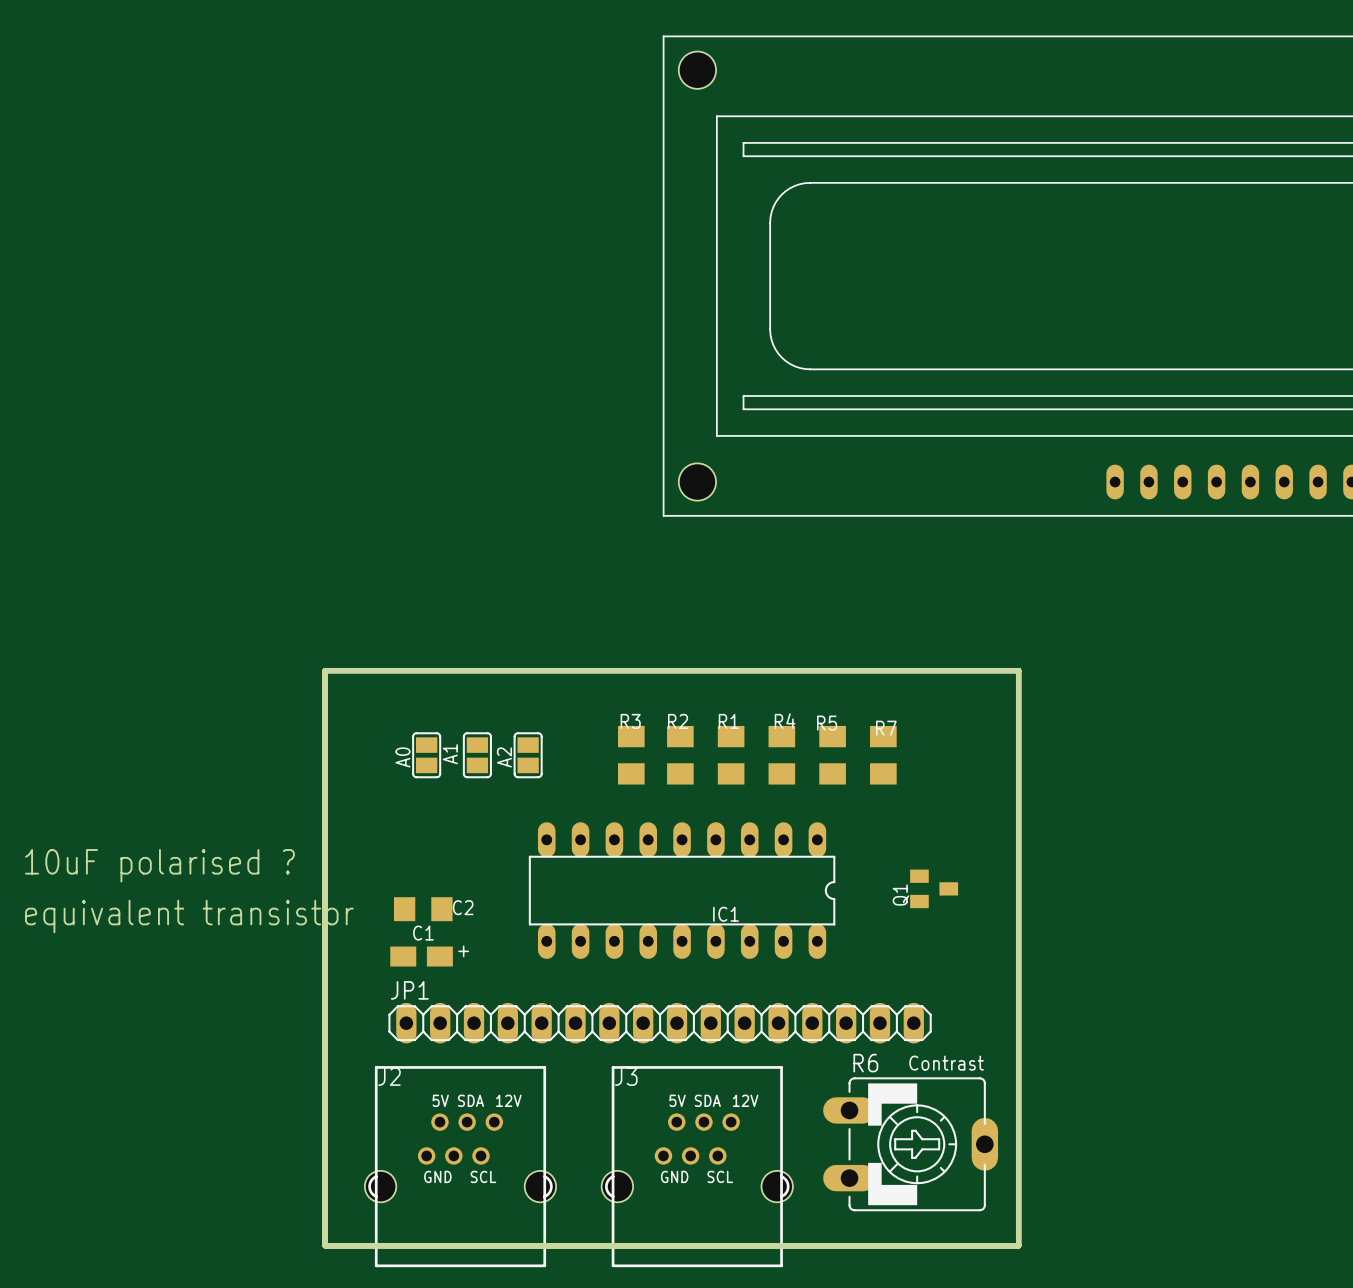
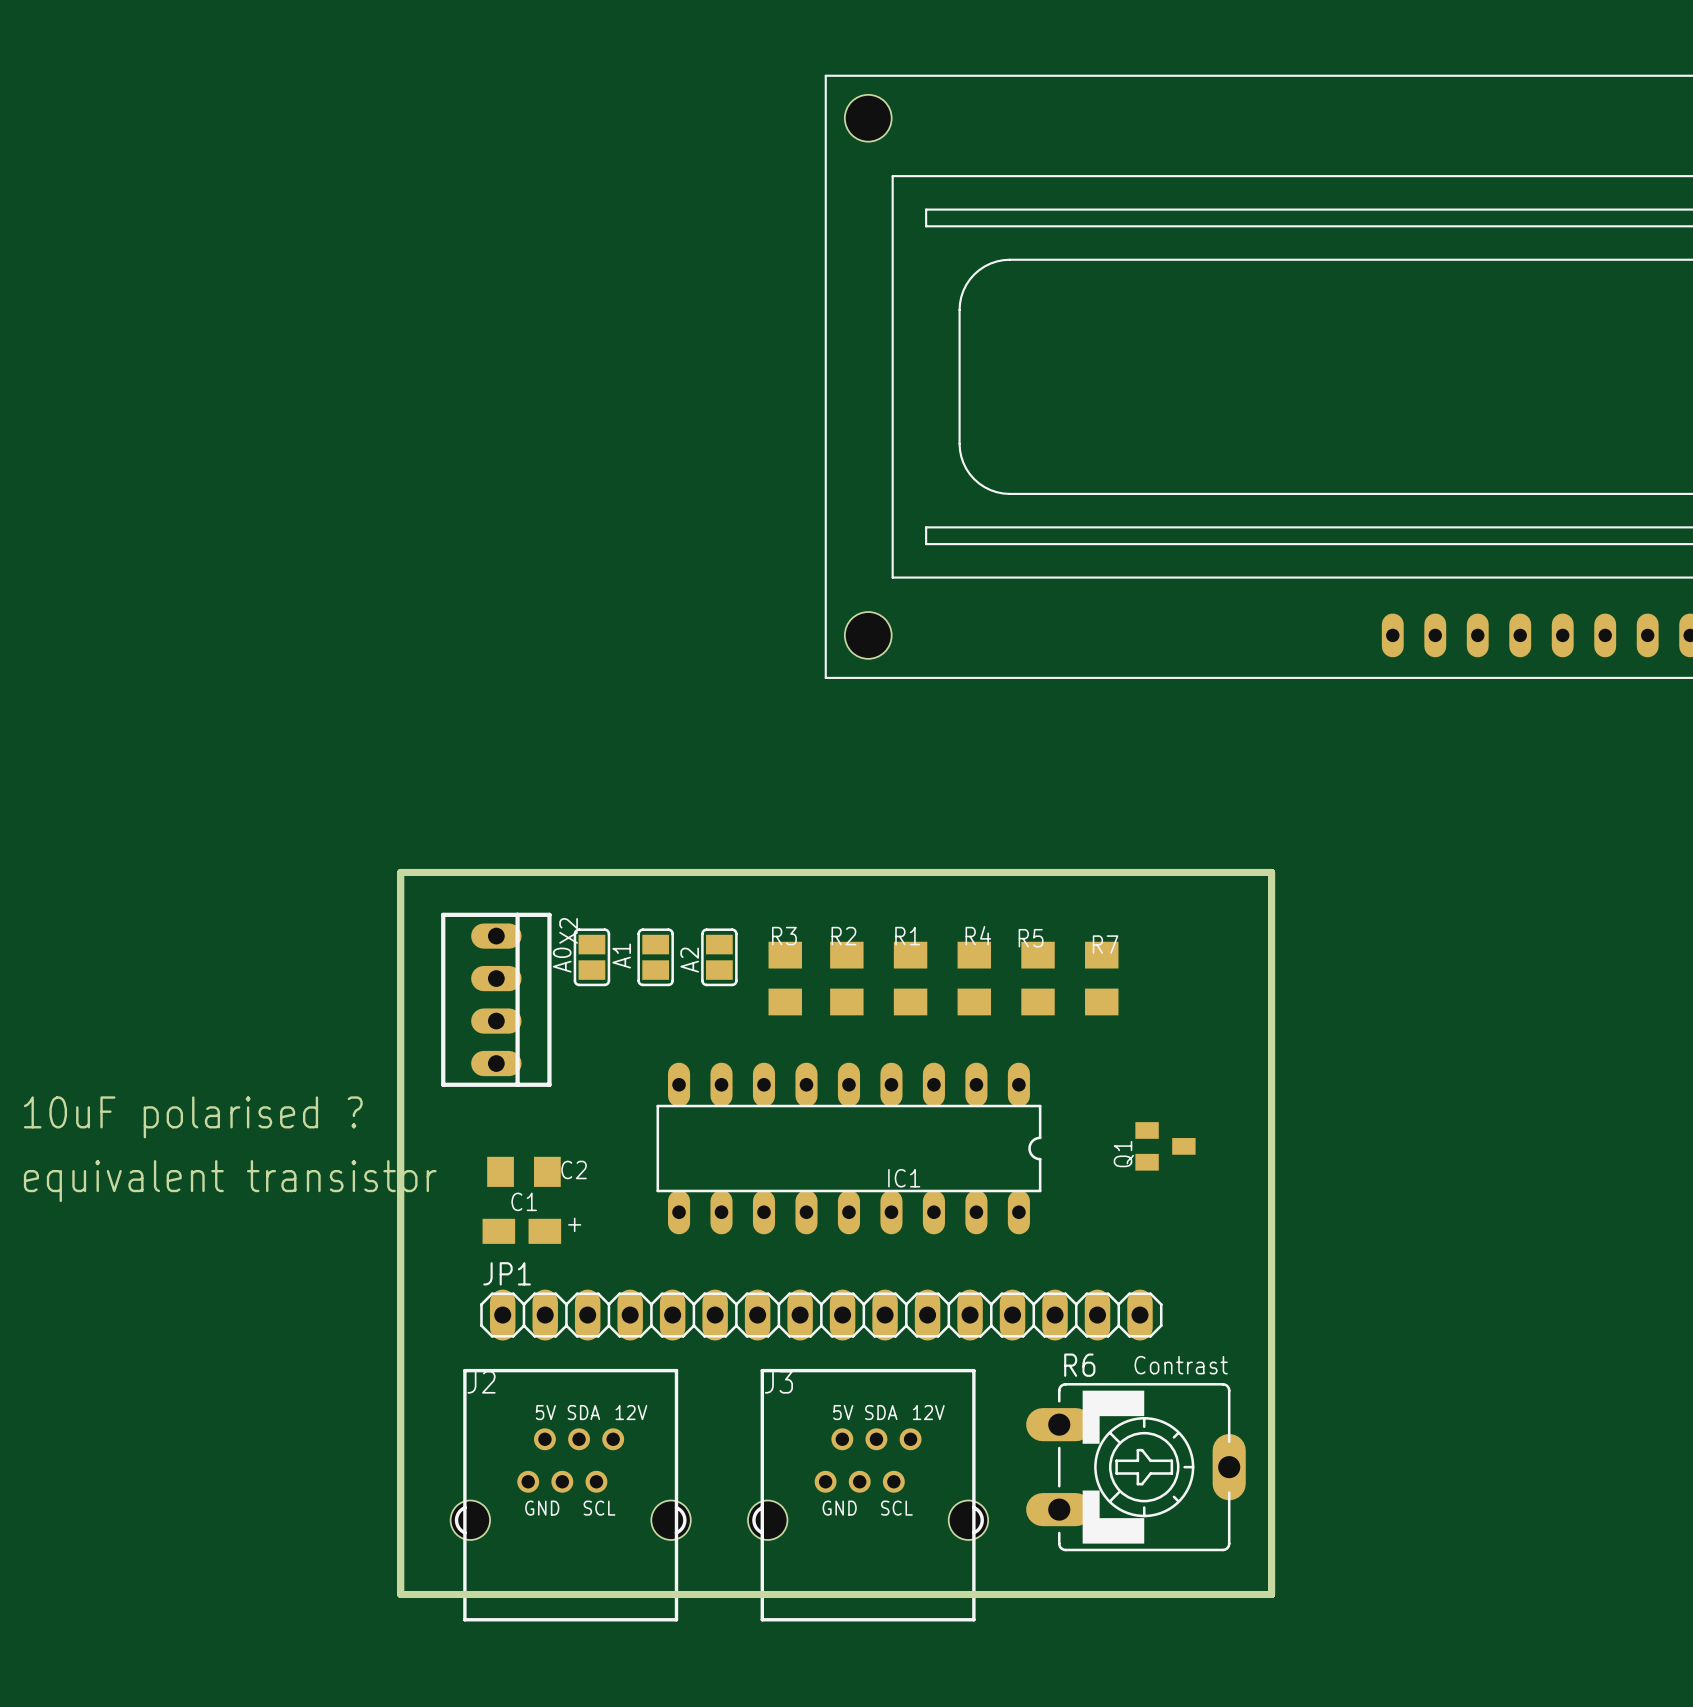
A0 position: (426, 755) -> (591, 957)
A1 position: (477, 755) -> (655, 957)
A2 position: (528, 755) -> (719, 957)
X2: none -> (496, 999)

